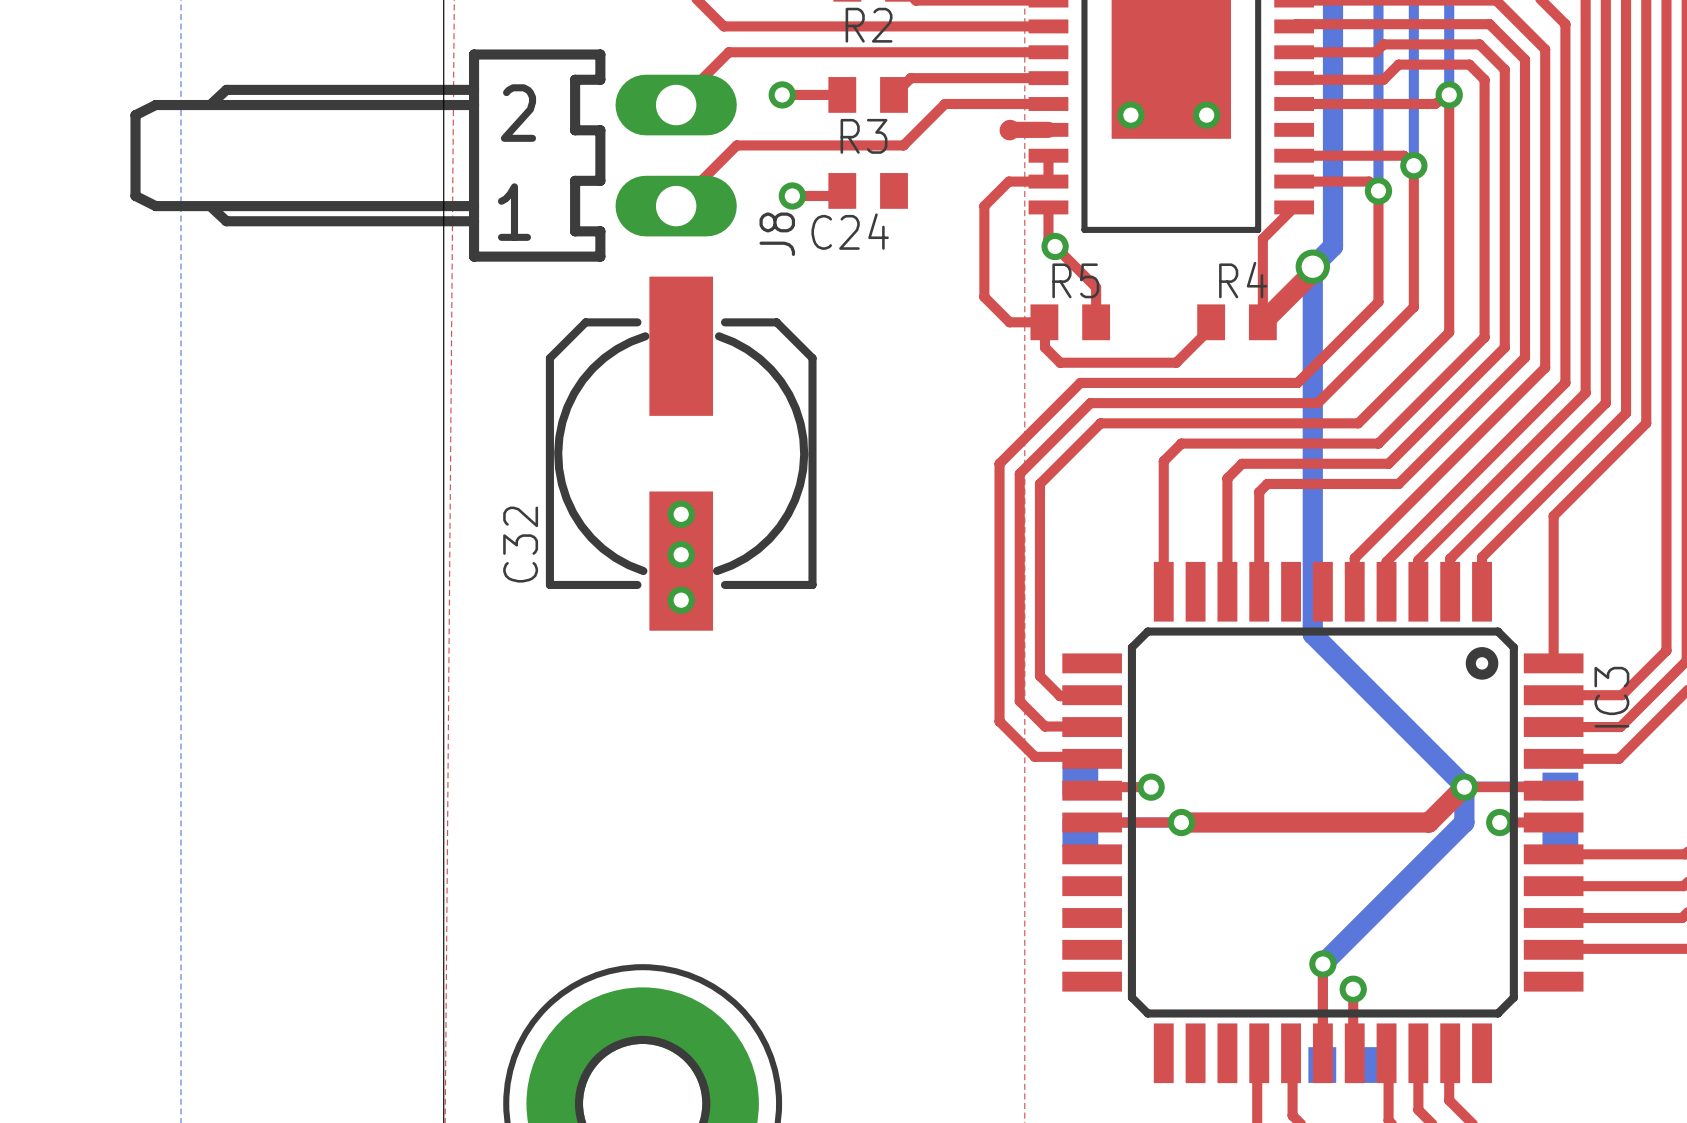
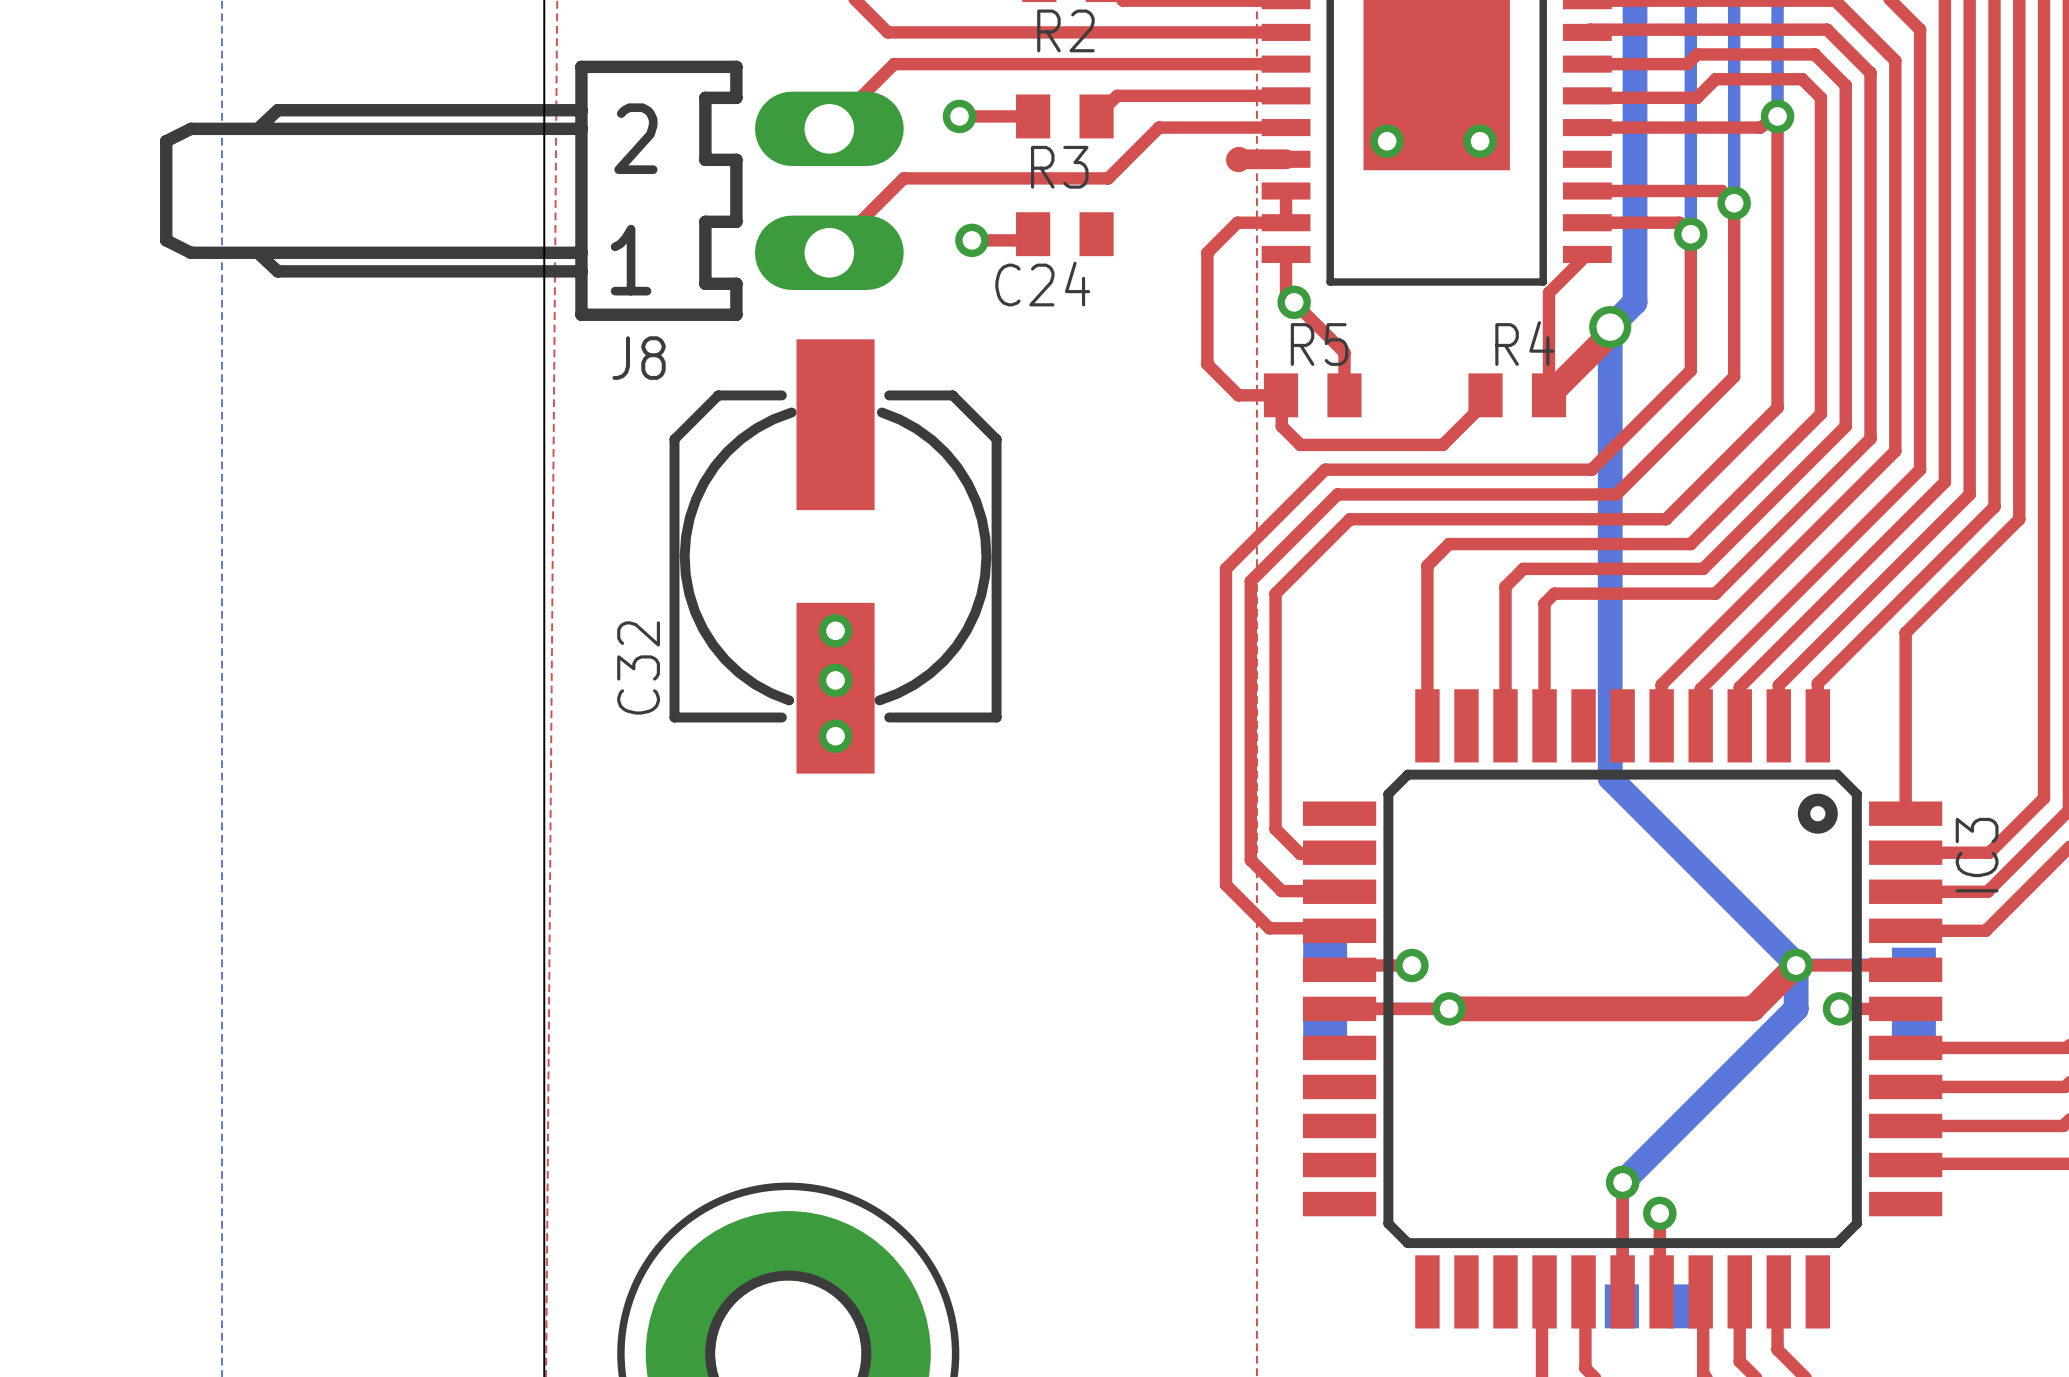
J8 name rotation: 0° (777, 234) -> 90° clockwise (639, 358)
J8 name position: J8 (777, 234) -> J8 (639, 358)

